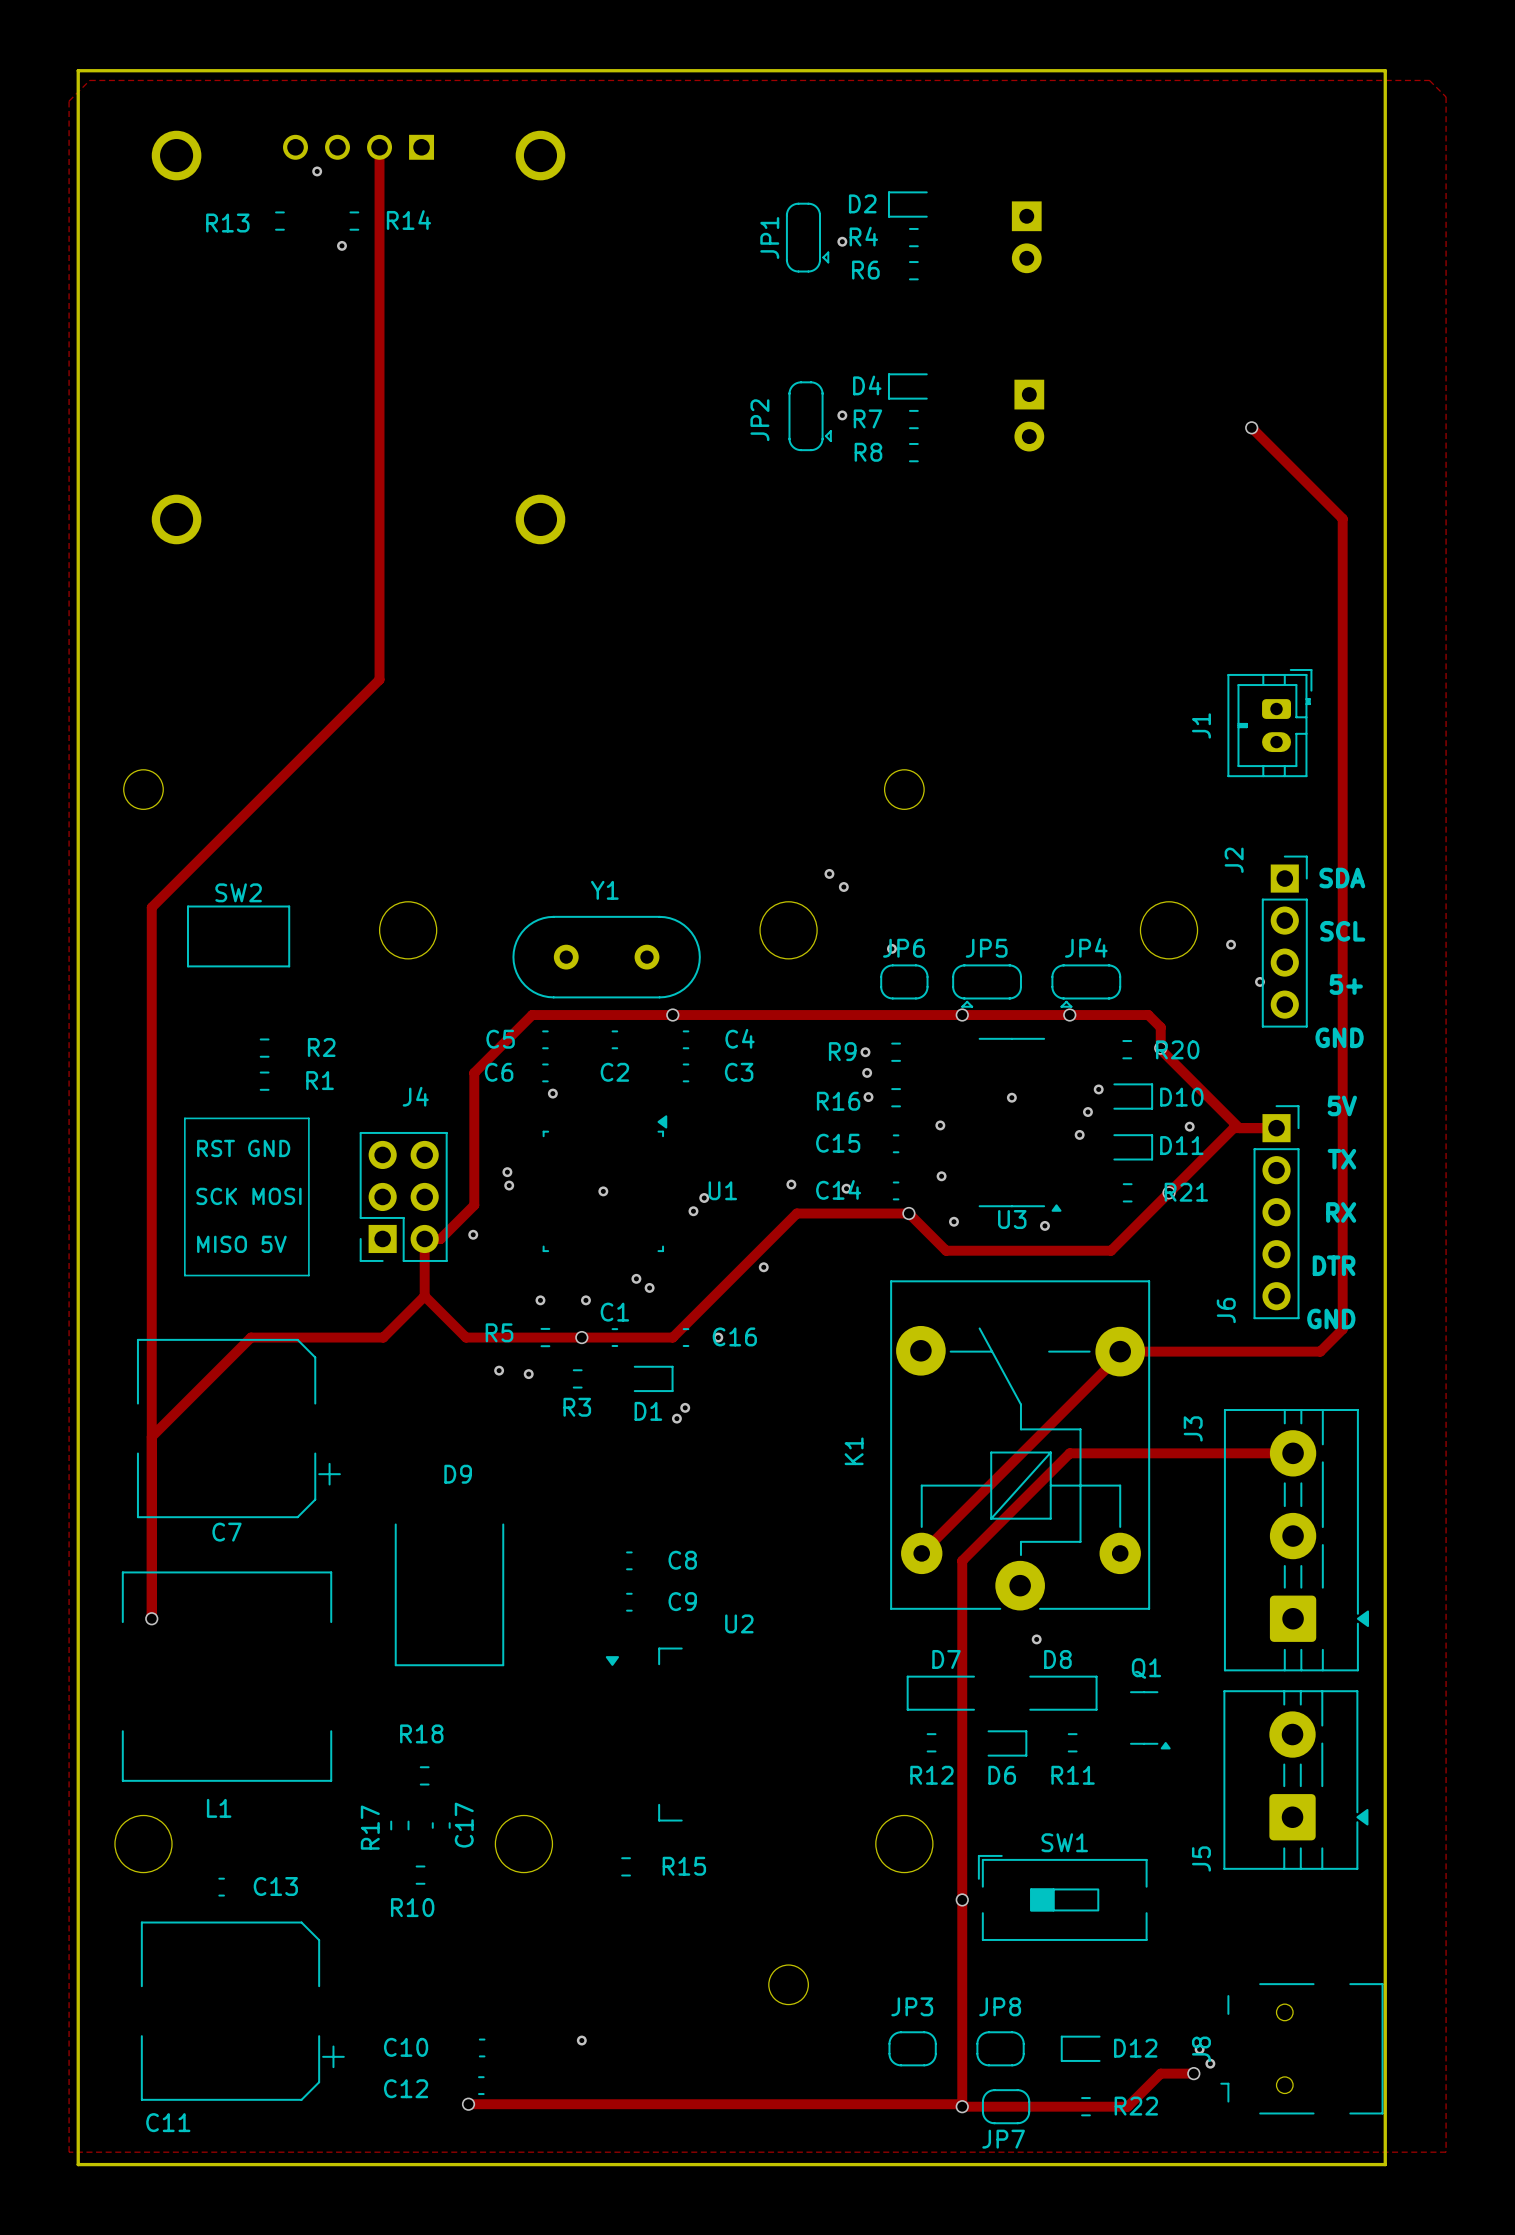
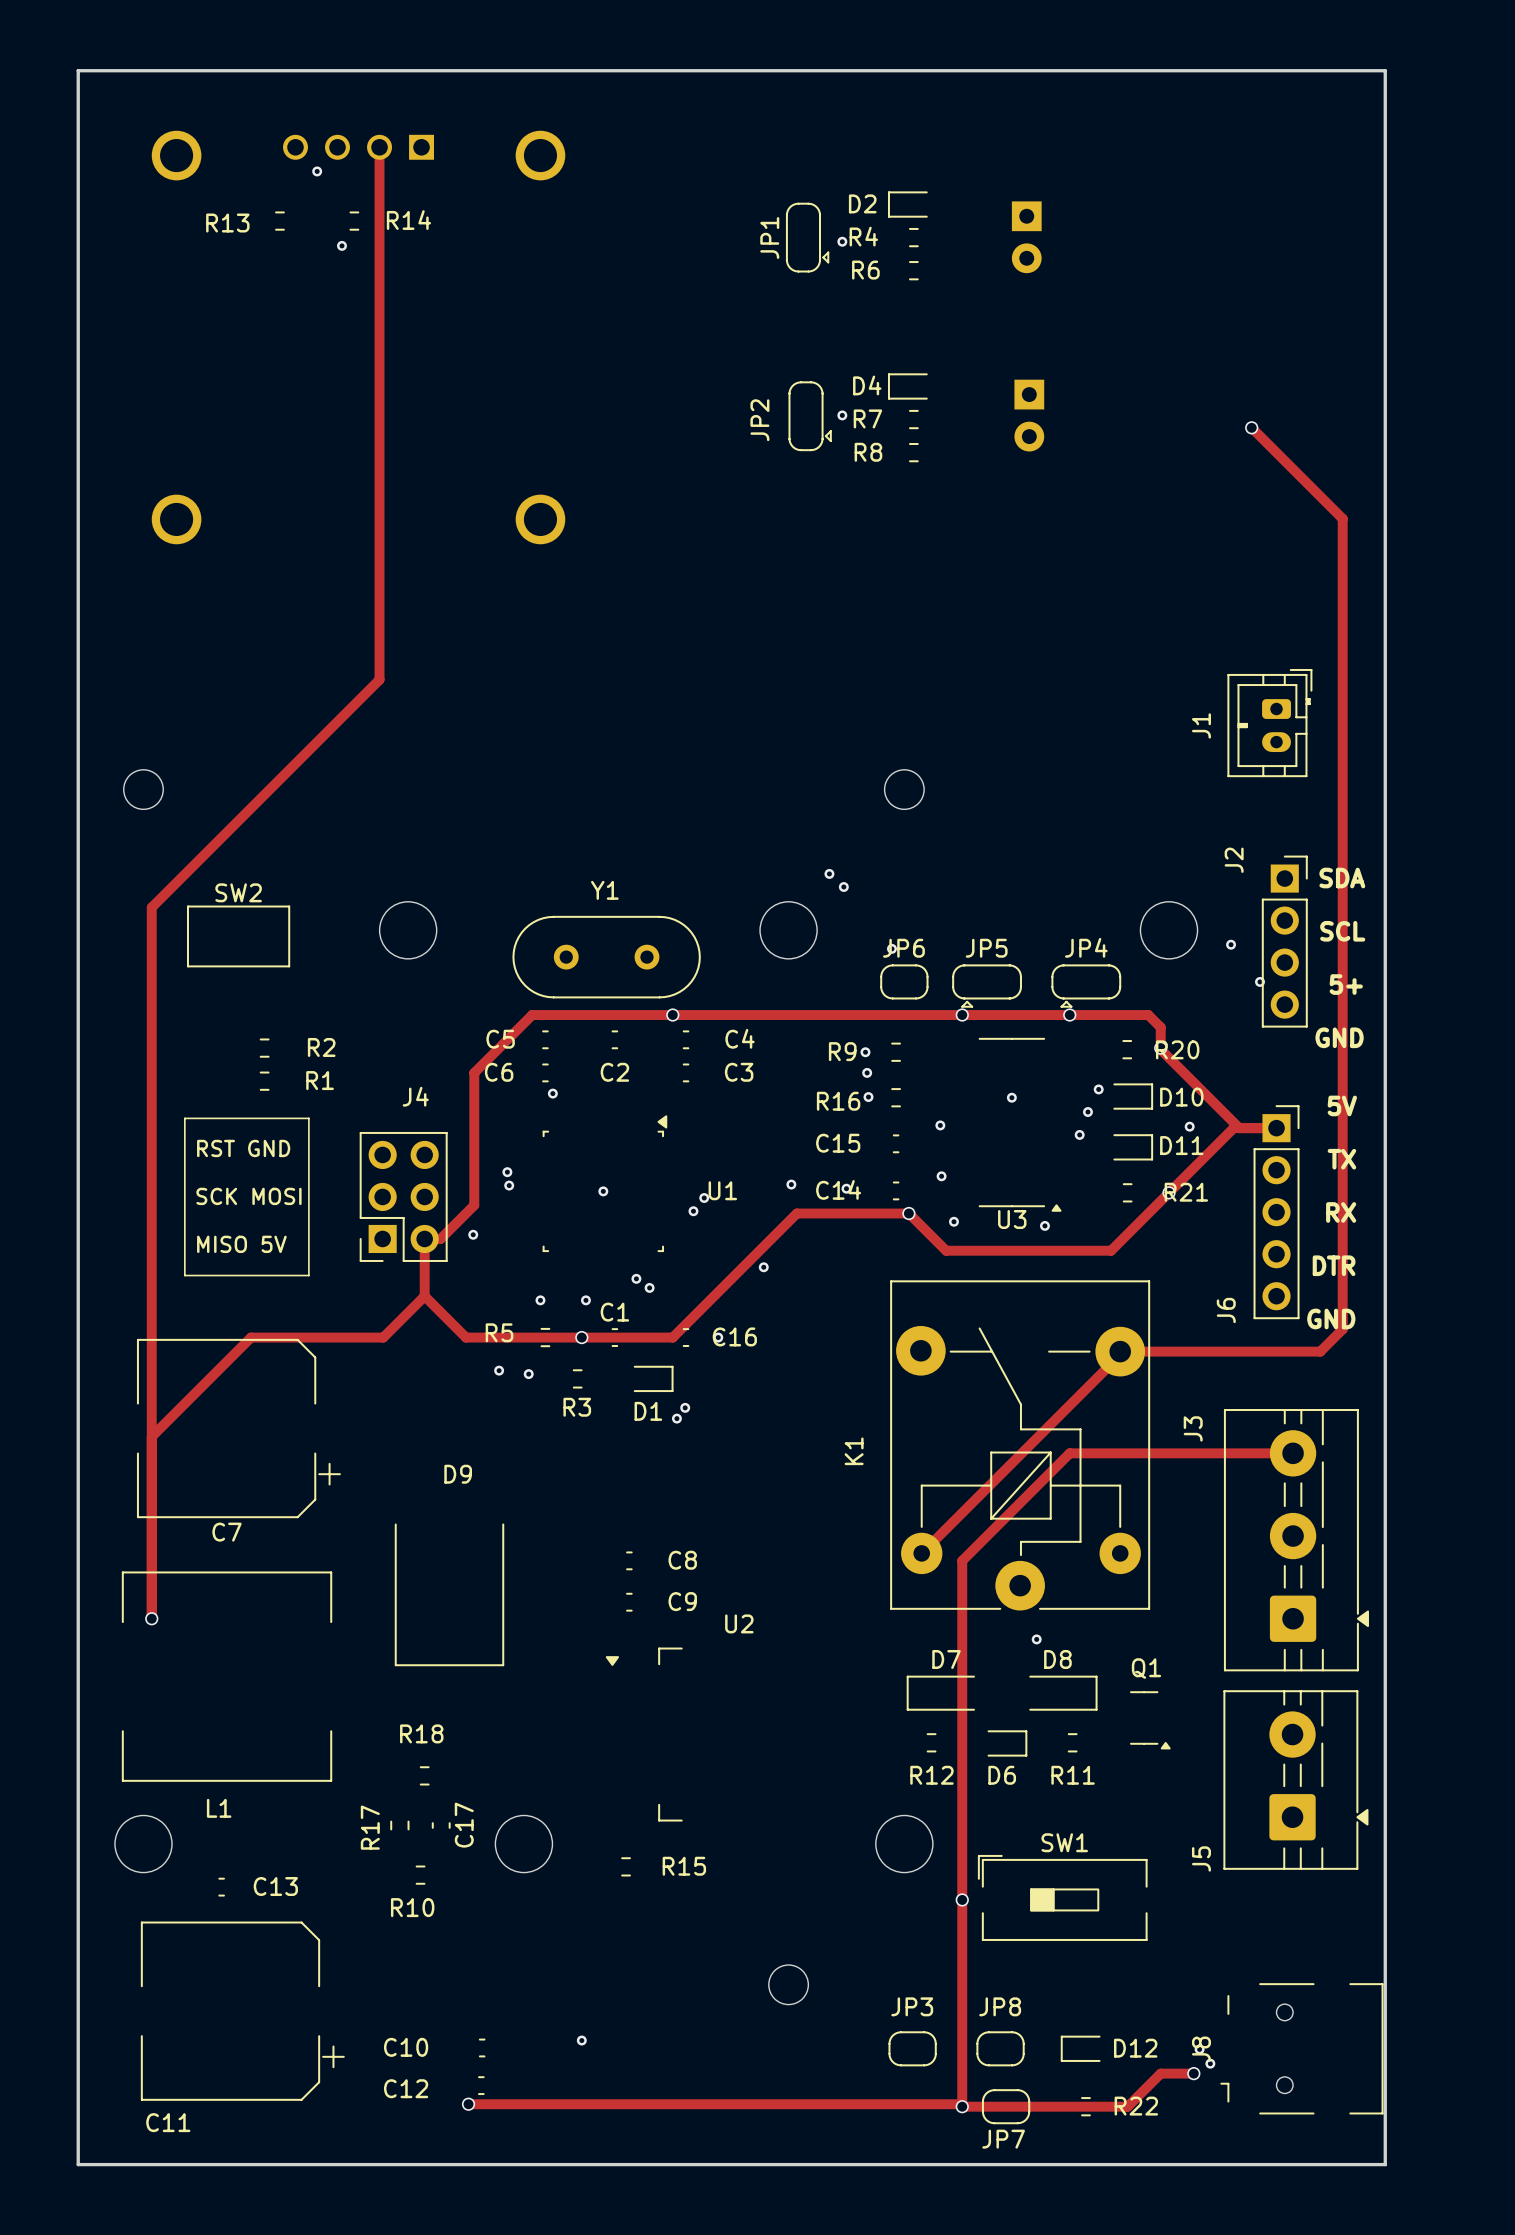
zone outline: (89, 80) (1429, 80) (1446, 97) (1446, 2152) (69, 2152) (69, 101) (89, 80) -> none

